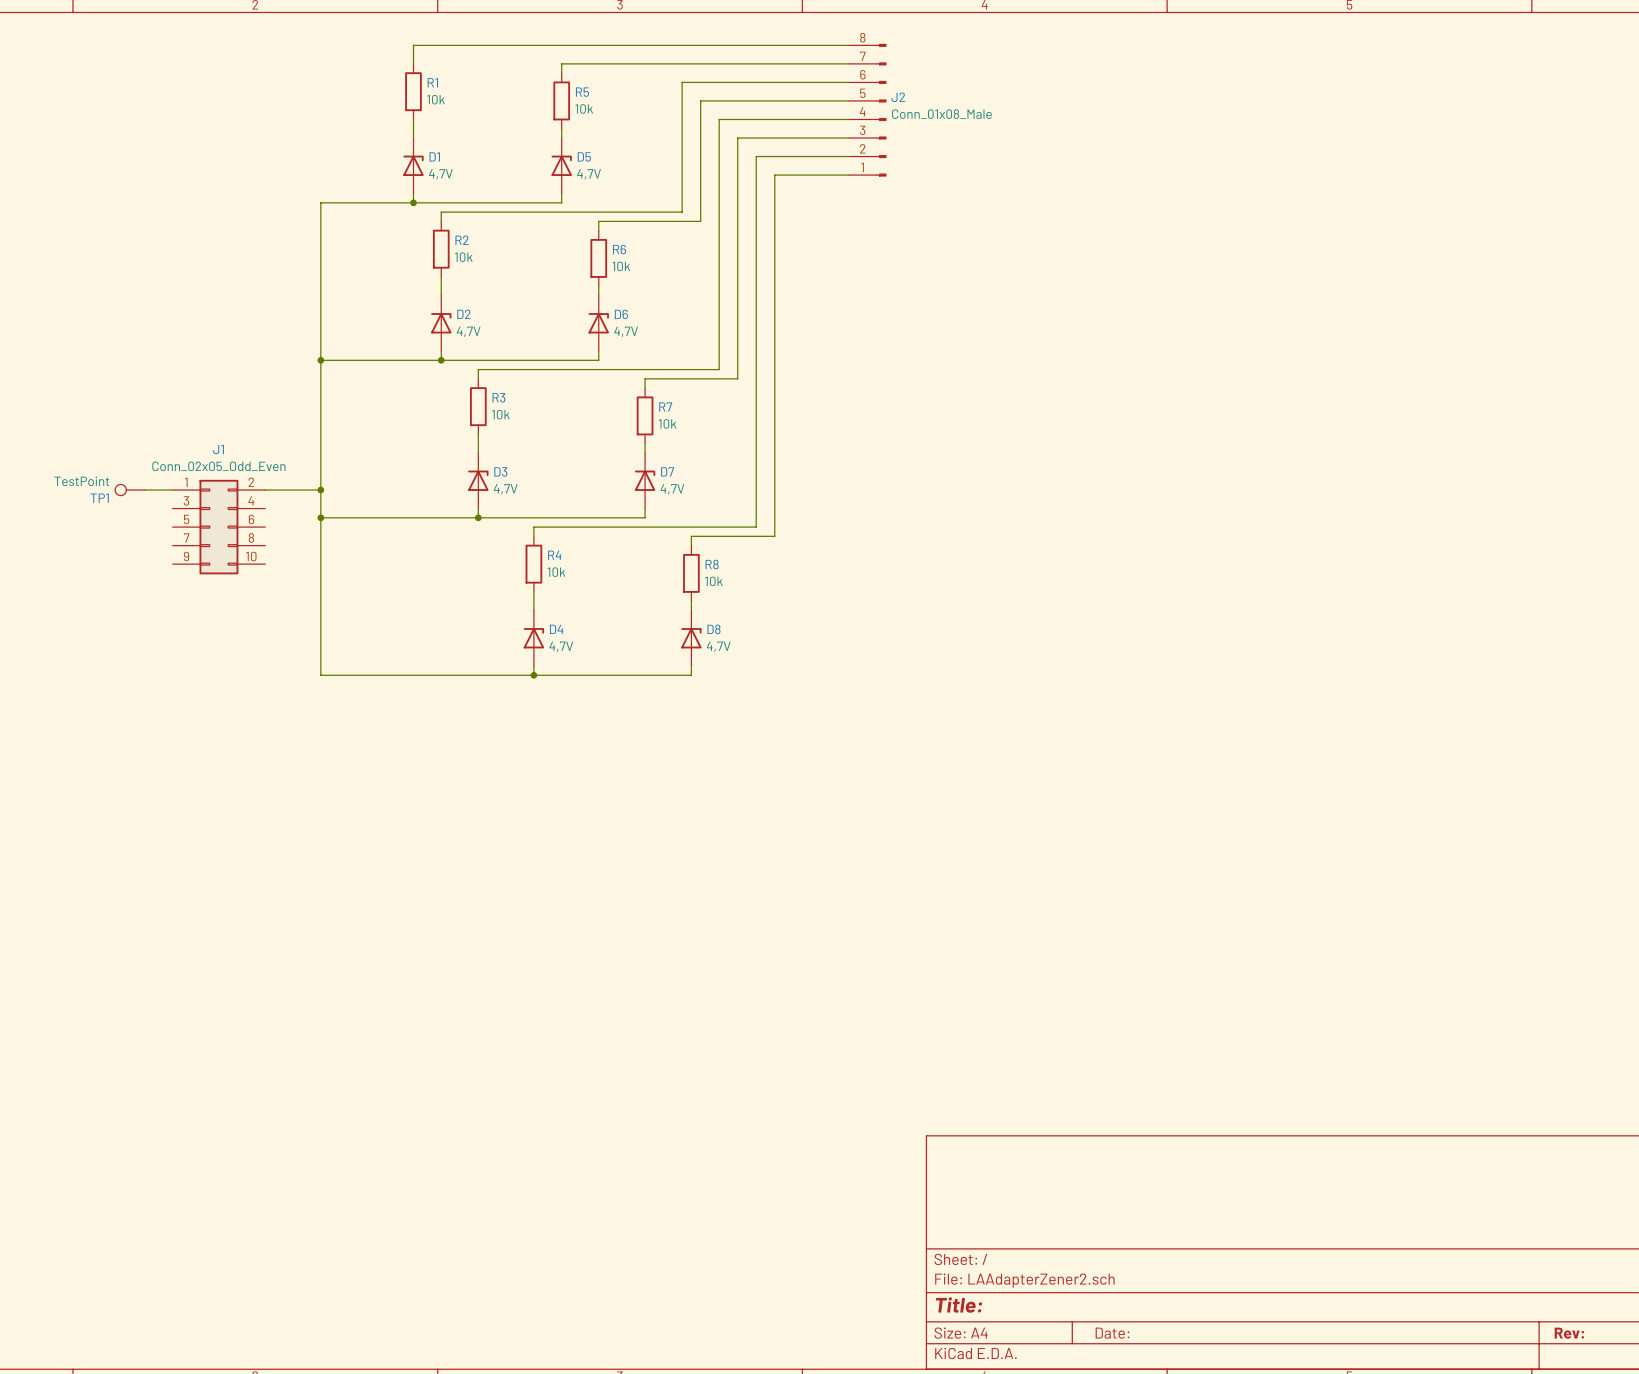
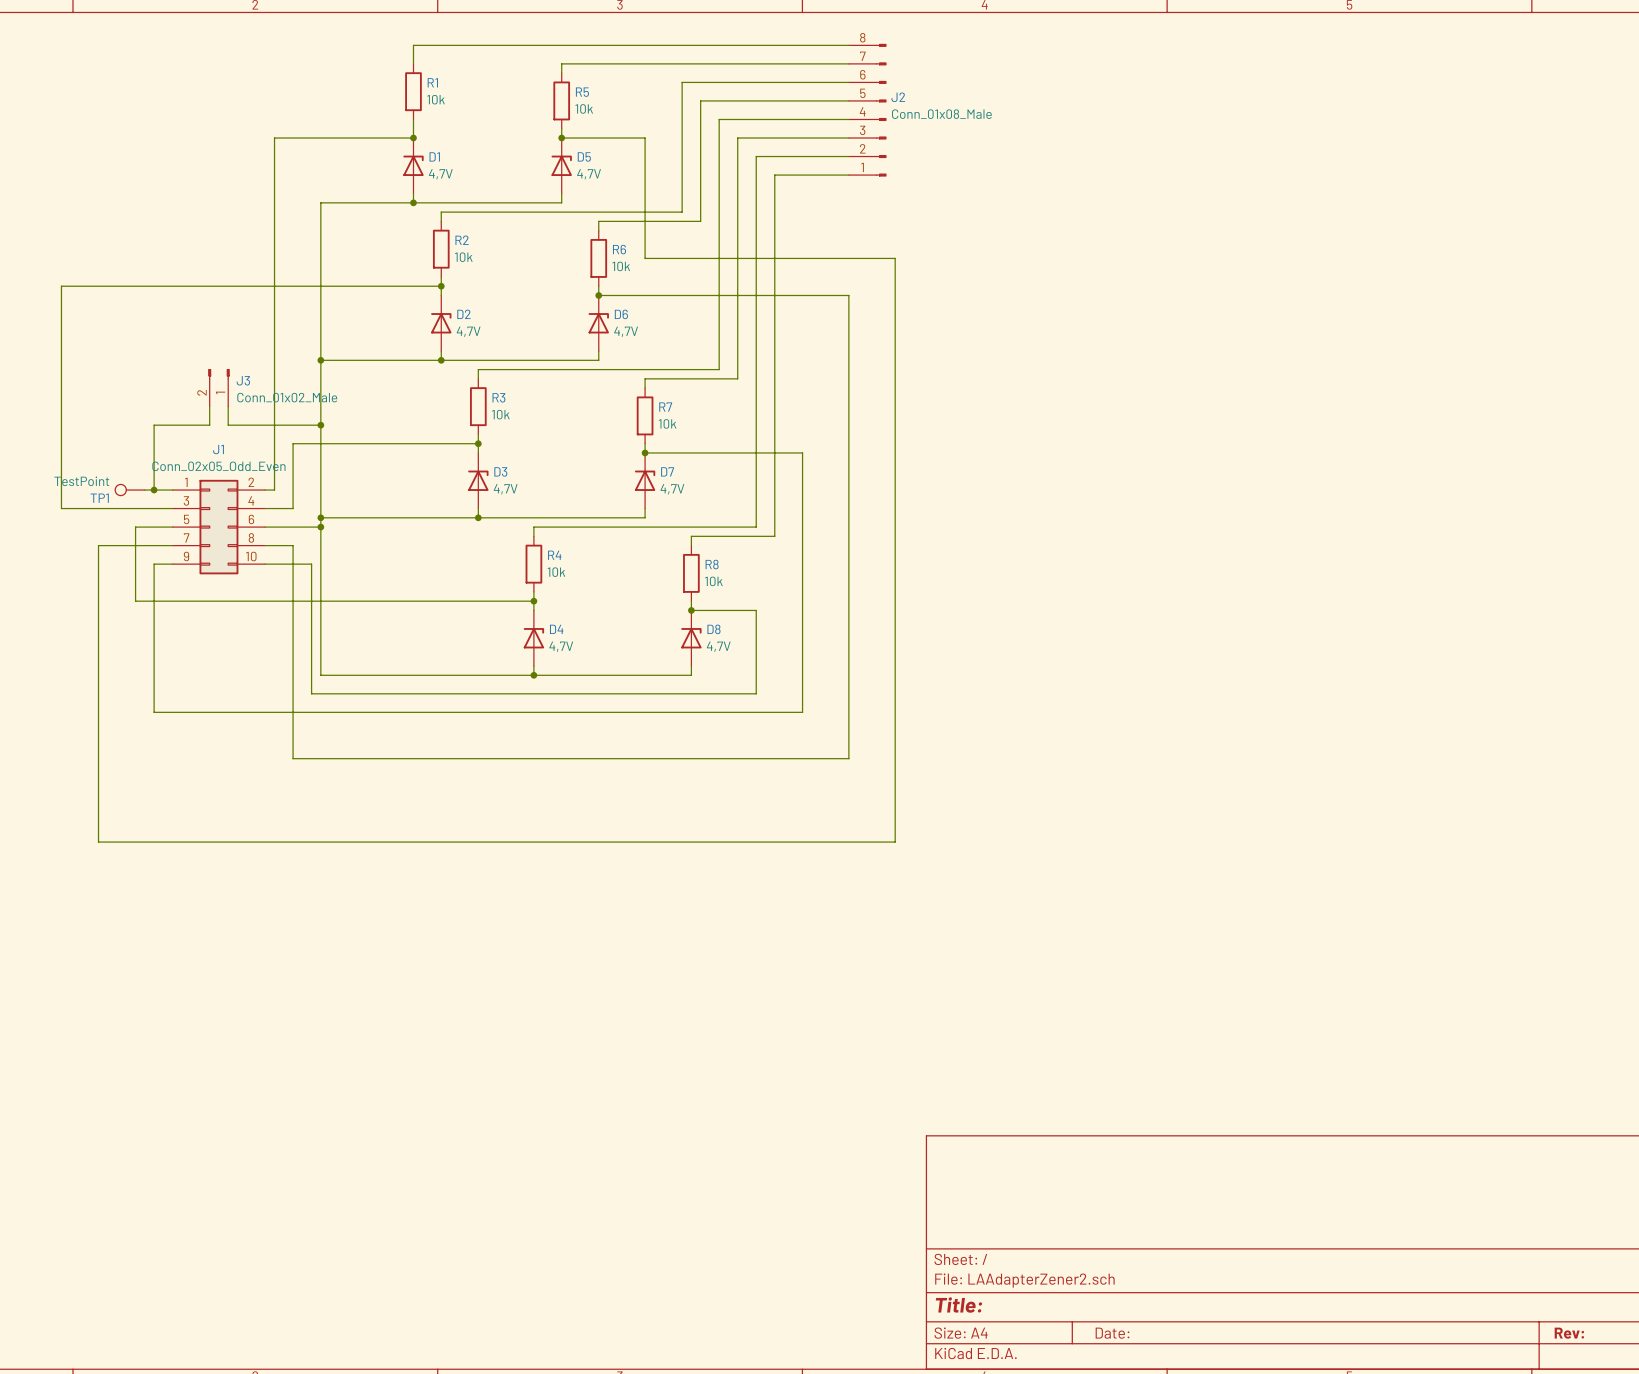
junction: none -> (413, 138)
wire: none -> (561, 138) (645, 138) (645, 258) (895, 258) (895, 842) (98, 842) (98, 545) (172, 545)
junction: none -> (561, 138)
wire: none -> (441, 286) (61, 286) (61, 508) (172, 508)
junction: none -> (441, 286)
wire: none -> (598, 295) (848, 295) (848, 758) (293, 758) (293, 545) (265, 545)
junction: none -> (598, 295)
J3: none -> Conn_01x02_Male (218, 387)
wire: none -> (209, 406) (209, 425) (154, 425) (154, 490)
wire: none -> (228, 406) (228, 425) (320, 425)
junction: none -> (320, 425)
wire: none -> (478, 443) (293, 443) (293, 508) (265, 508)
junction: none -> (478, 443)
wire: none -> (645, 452) (802, 452) (802, 712) (154, 712) (154, 564) (172, 564)
junction: none -> (645, 452)
junction: none -> (154, 490)
wire: (274, 490) (320, 490) -> (274, 490) (274, 138) (413, 138)
junction: (320, 490) -> none
wire: none -> (172, 527) (135, 527) (135, 601) (533, 601)
wire: none -> (265, 527) (320, 527)
junction: none -> (320, 527)
wire: none -> (265, 564) (311, 564) (311, 693) (756, 693) (756, 610) (691, 610)
junction: none -> (533, 601)
junction: none -> (691, 610)

